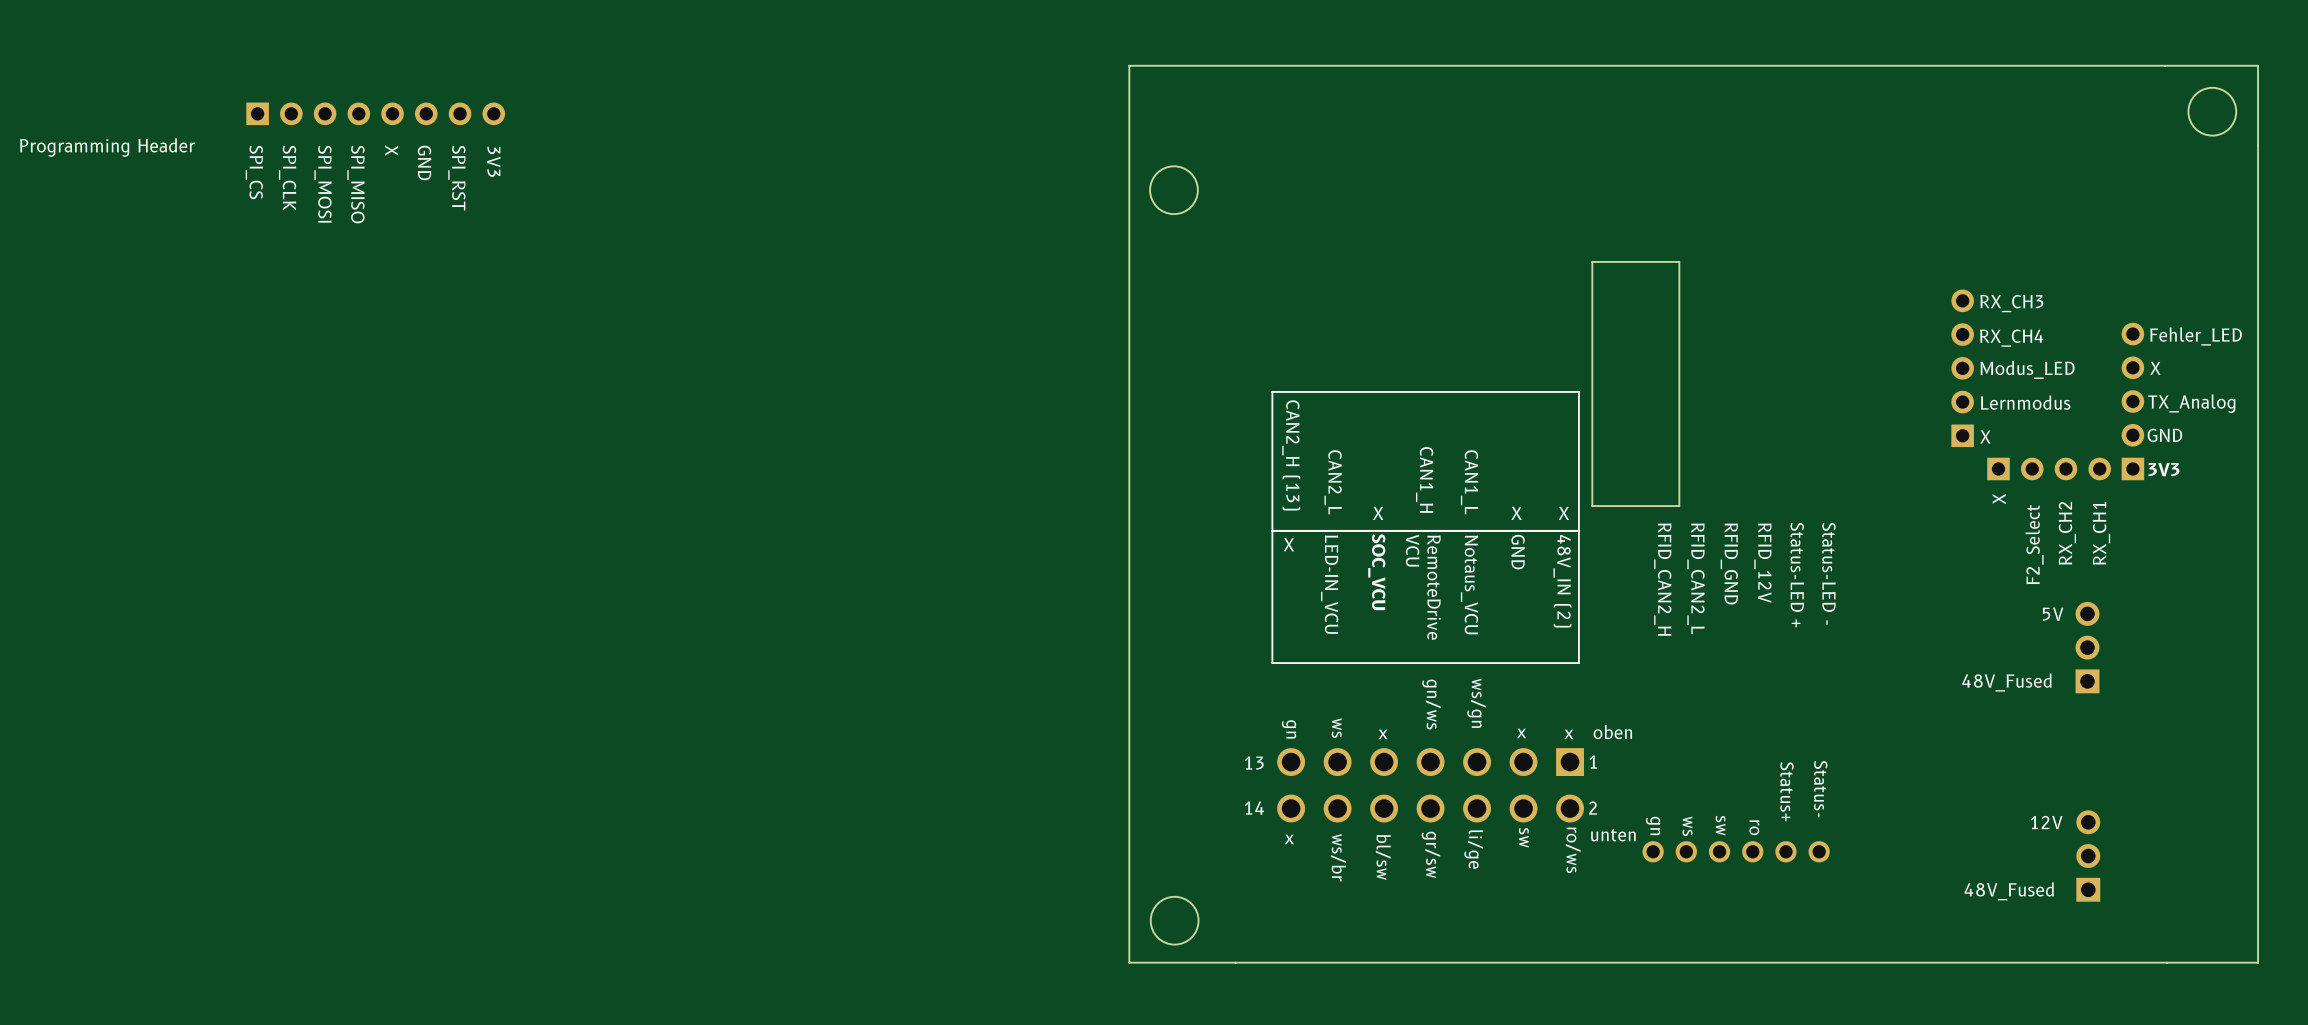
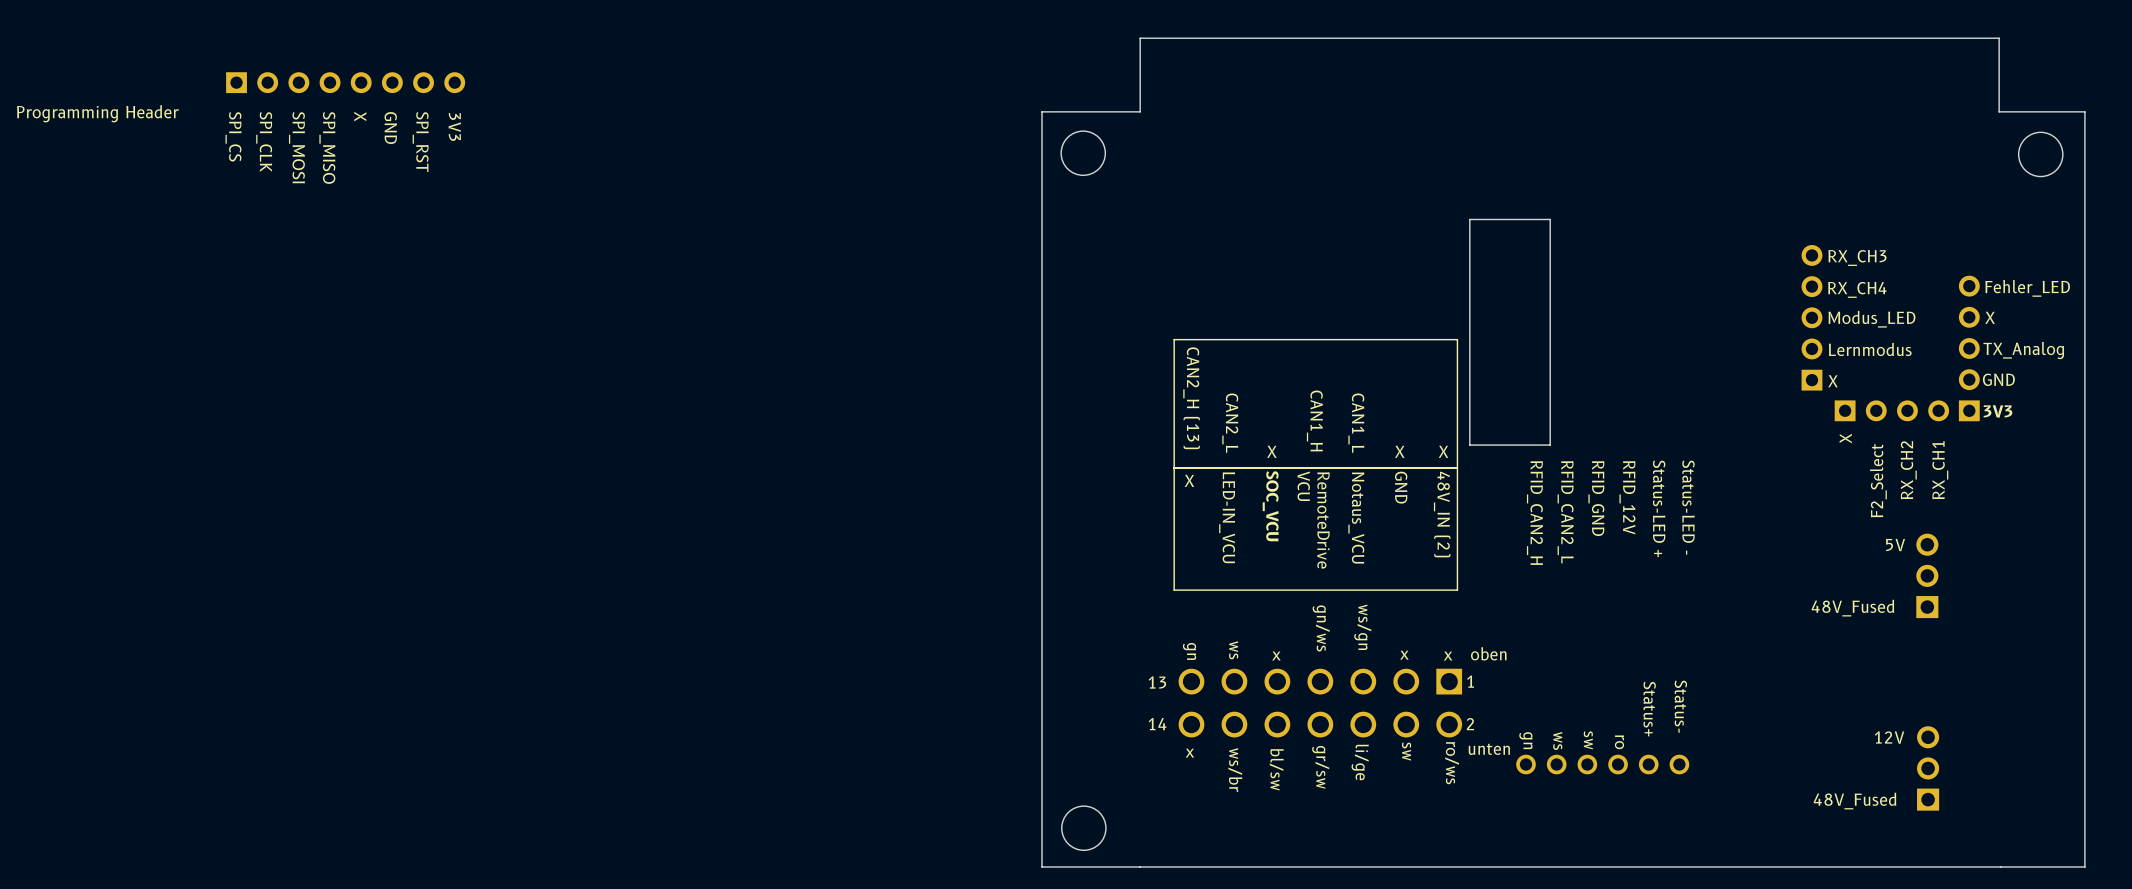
board edge: (1235, 65) (1129, 65) (1129, 145) -> (1140, 38) (1140, 111) (1042, 111)
board edge: (2165, 65) (2258, 65) (2258, 145) -> (1999, 38) (1999, 111) (2084, 111)
round board edge position: (2212, 111) -> (2040, 154)

